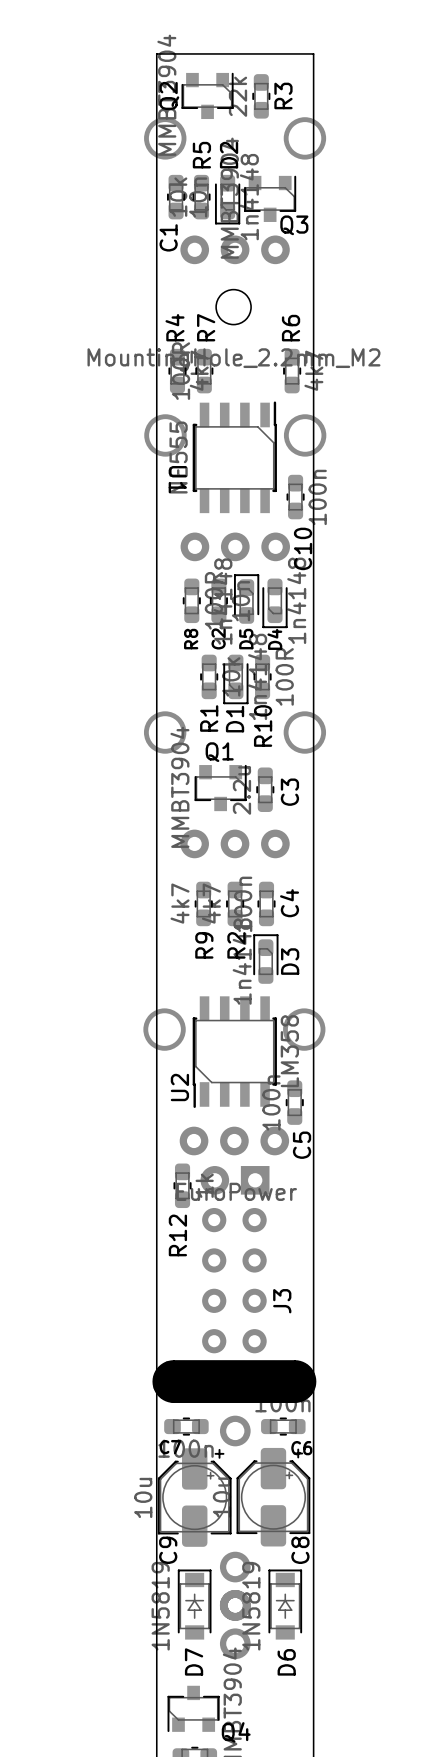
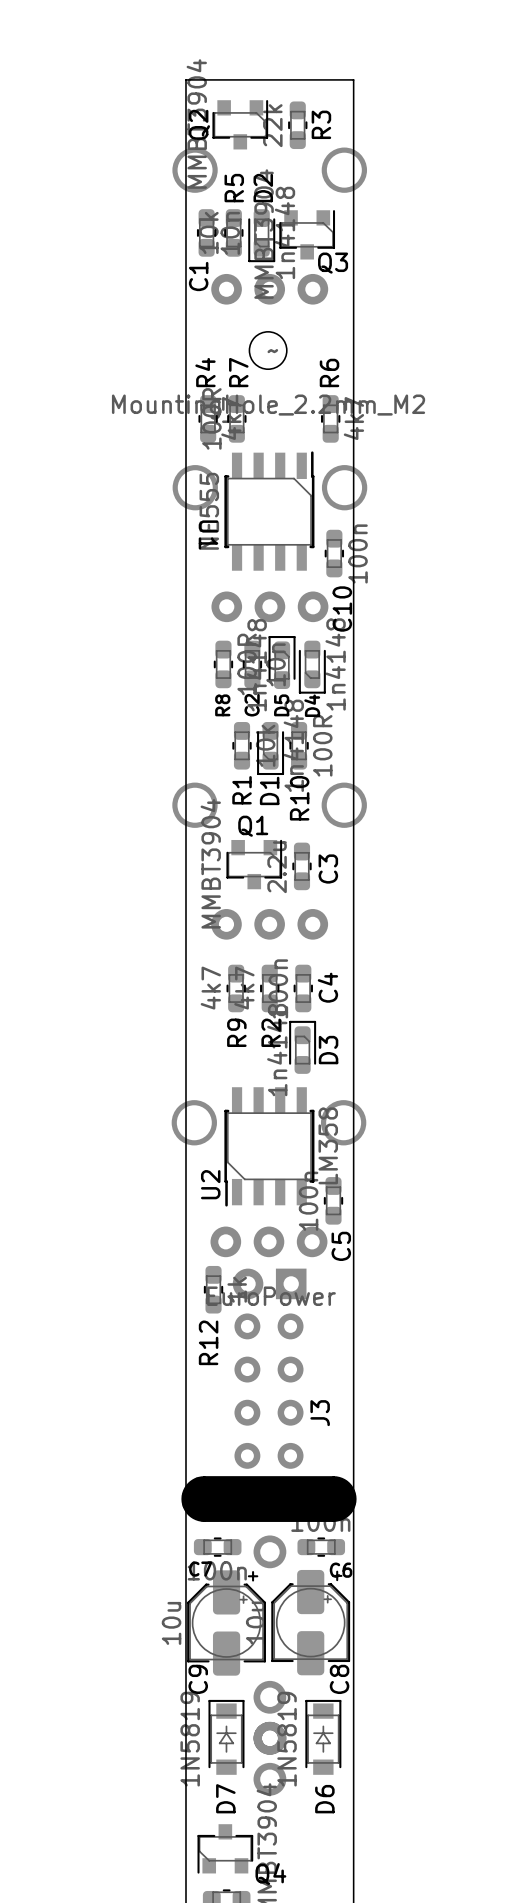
part text: none -> ~ (272, 351)

